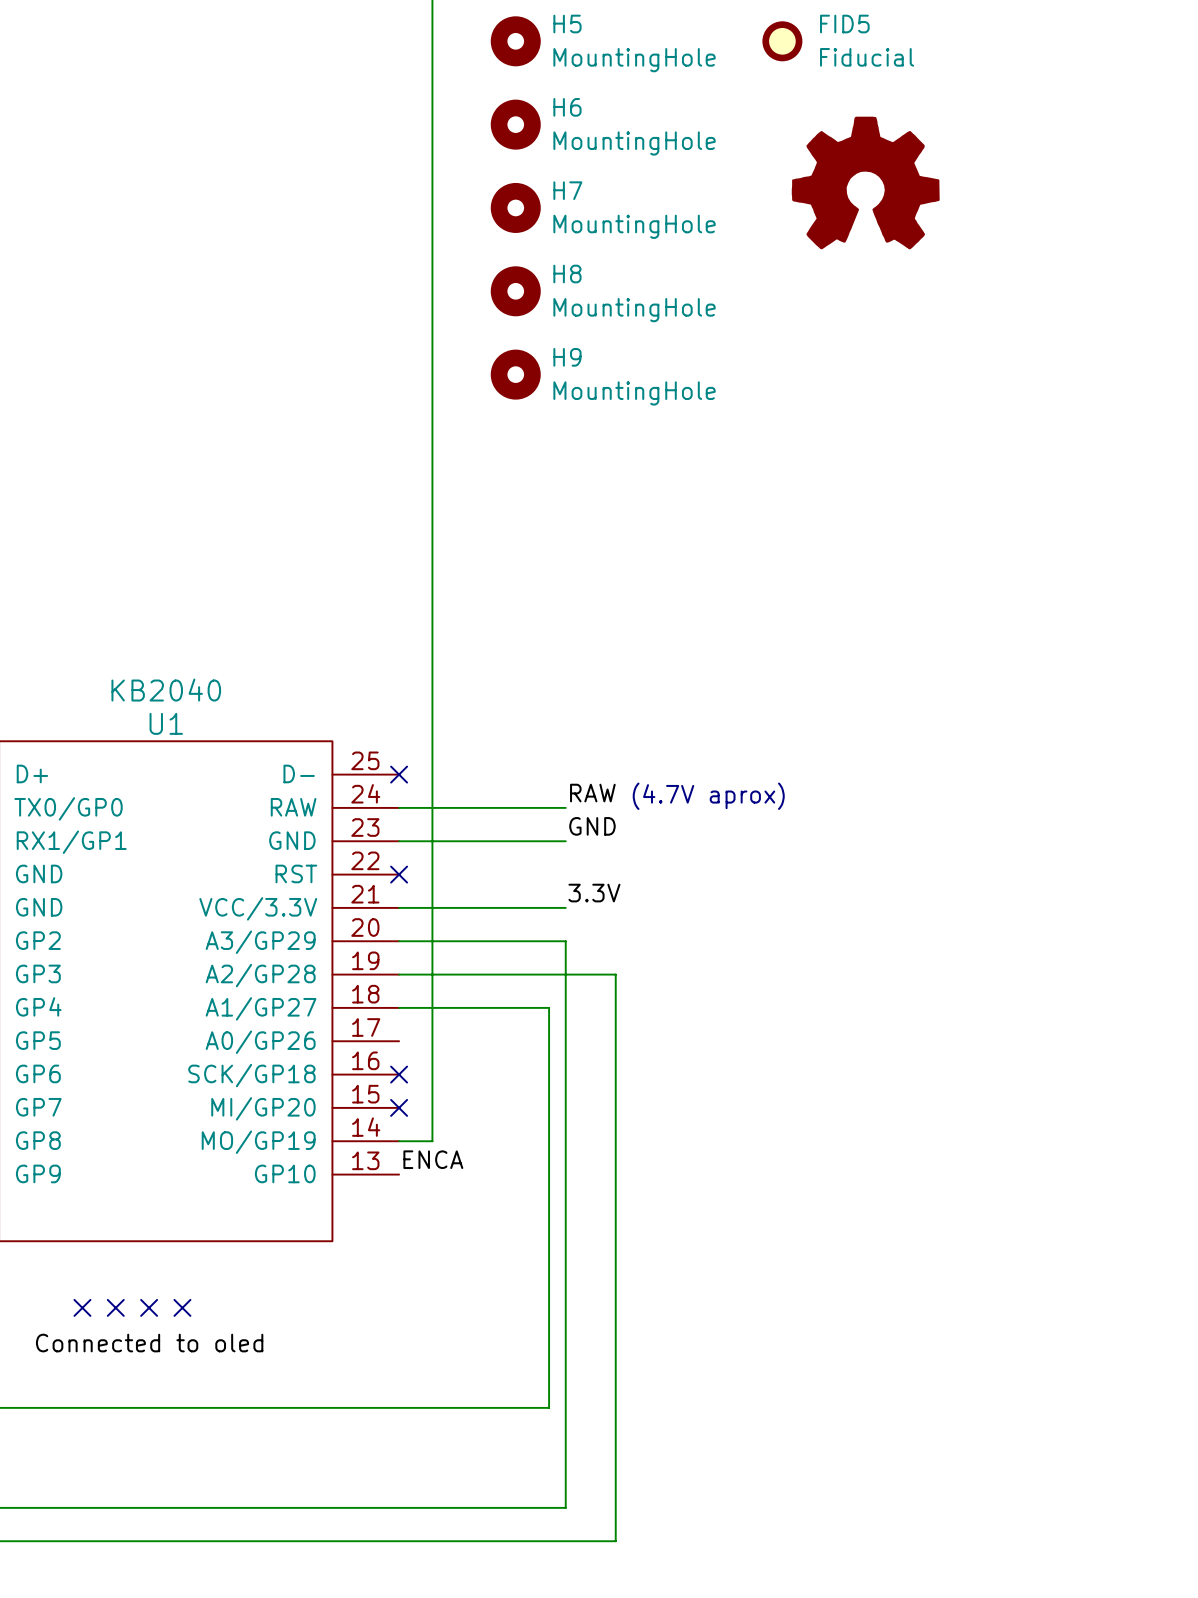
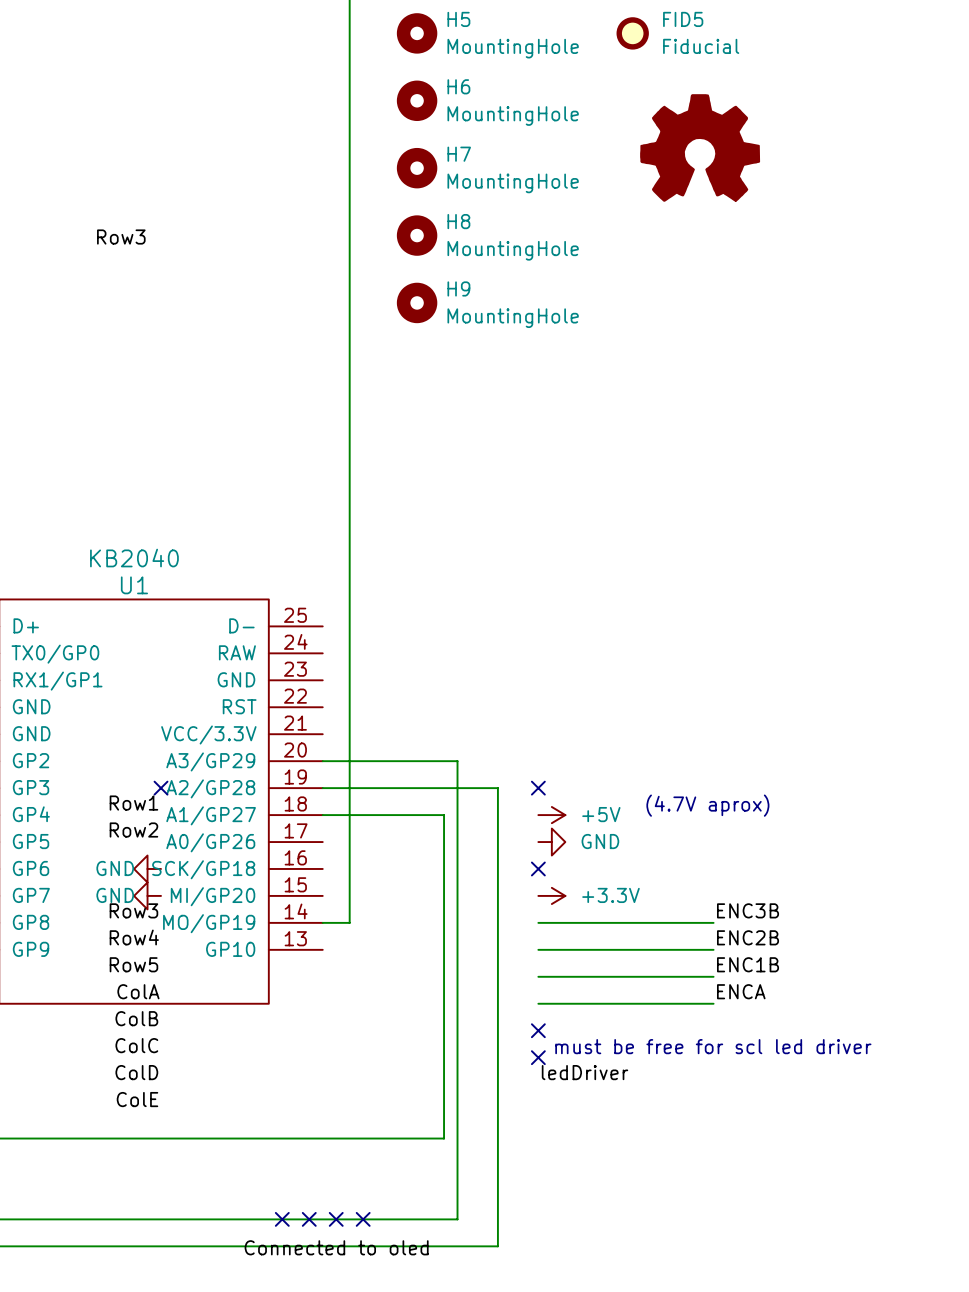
label: none -> Row3 (121, 237)
no-connect mark: (399, 774) -> none
label: RAW (592, 793) -> none
text position: (4.7V aprox) (708, 796) -> (4.7V aprox) (707, 805)
wire: (399, 807) (565, 807) -> none
label: GND (592, 826) -> none
wire: (399, 841) (565, 841) -> none
no-connect mark: (399, 874) -> none
label: 3.3V (594, 893) -> none
wire: (399, 907) (565, 907) -> none
no-connect mark: none -> (161, 788)
no-connect mark: none -> (538, 788)
label: none -> Row1 (133, 803)
power symbol: none -> +5V (551, 815)
label: none -> Row2 (133, 830)
power symbol: none -> GND (551, 842)
power symbol: none -> GND (147, 868)
no-connect mark: (399, 1074) -> none
no-connect mark: none -> (538, 868)
power symbol: none -> GND (147, 895)
no-connect mark: (399, 1107) -> none
power symbol: none -> +3.3V (551, 895)
label: none -> Row3 (133, 910)
label: none -> ENC3B (748, 910)
wire: none -> (538, 922) (713, 922)
label: none -> Row4 (134, 937)
label: ENCA (433, 1159) -> none
label: none -> ENC2B (748, 937)
wire: none -> (538, 949) (713, 949)
label: none -> Row5 (133, 964)
label: none -> ENC1B (748, 964)
wire: none -> (538, 976) (713, 976)
label: none -> ColA (138, 991)
label: none -> ENCA (741, 991)
wire: none -> (538, 1003) (713, 1003)
label: none -> ColB (136, 1018)
no-connect mark: none -> (538, 1030)
label: none -> ColC (136, 1045)
text: none -> must be free for scl led driver (713, 1046)
no-connect mark: (82, 1307) -> none
no-connect mark: (115, 1307) -> none
no-connect mark: (149, 1307) -> none
no-connect mark: (182, 1307) -> none
no-connect mark: none -> (538, 1057)
label: none -> ColD (136, 1072)
label: none -> ledDriver (585, 1072)
label: Connected to oled (149, 1343) -> none
label: none -> ColE (137, 1099)
no-connect mark: none -> (282, 1219)
no-connect mark: none -> (309, 1219)
no-connect mark: none -> (336, 1219)
no-connect mark: none -> (363, 1219)
label: none -> Connected to oled (336, 1247)

